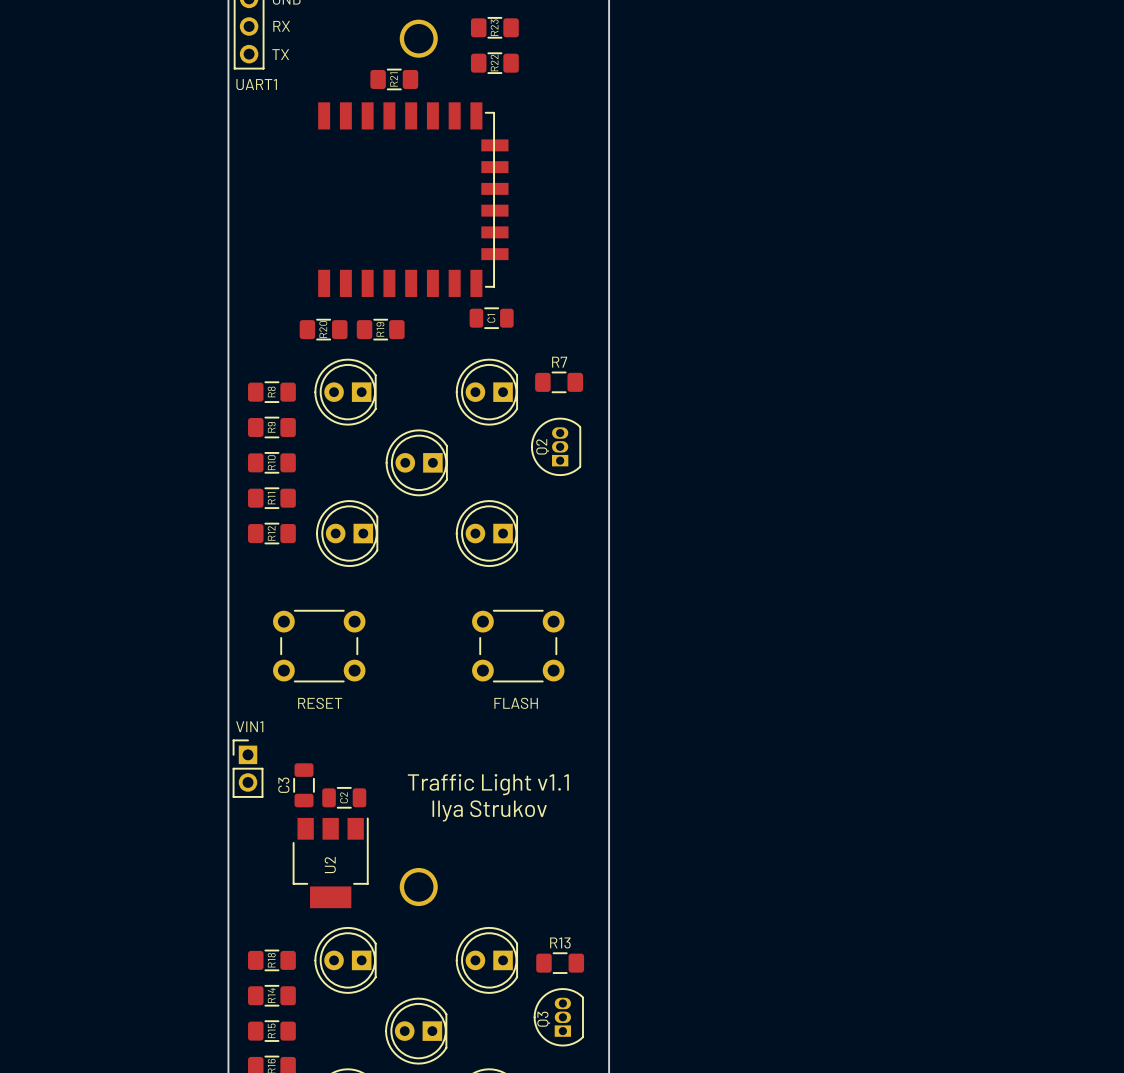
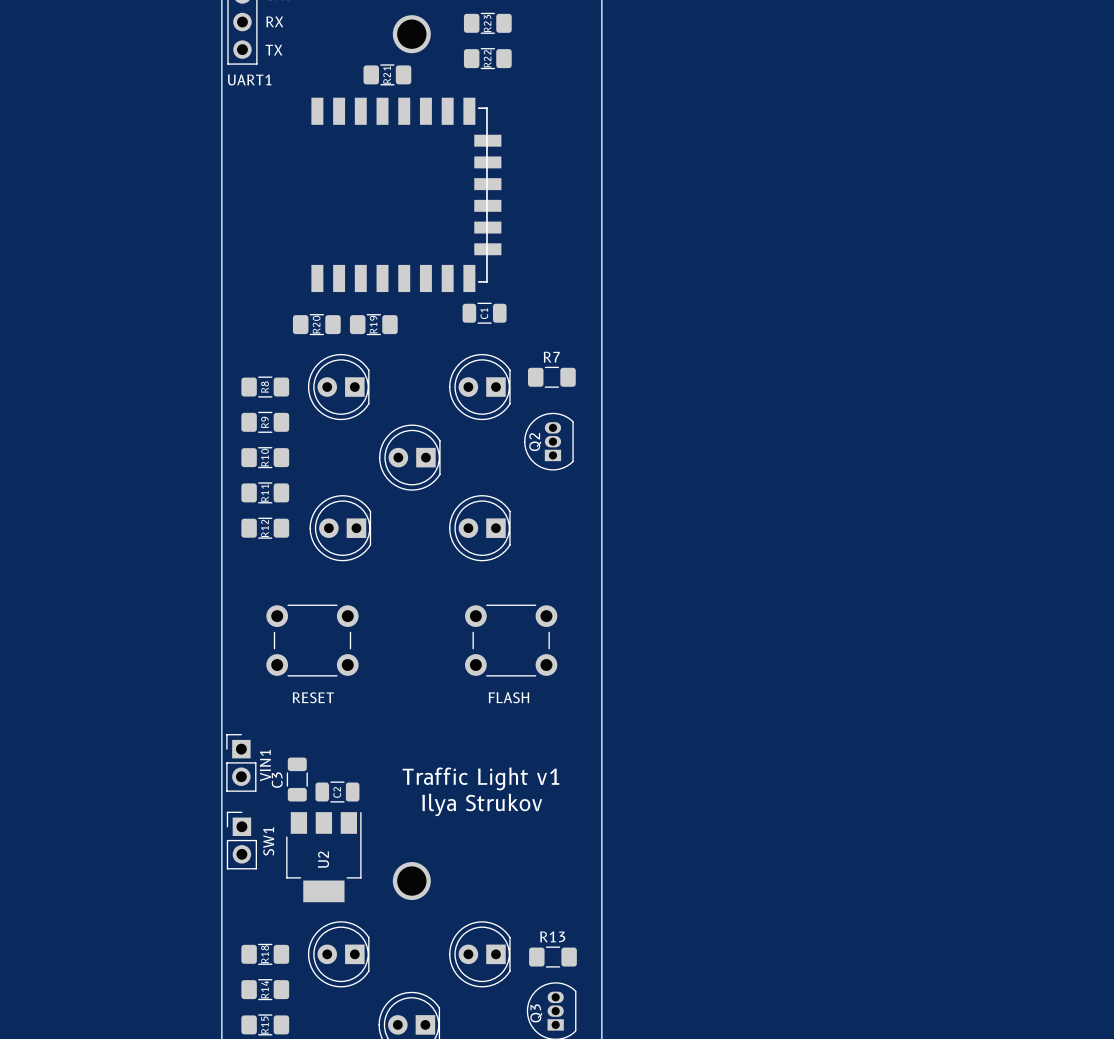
VIN1 name rotation: 0° (249, 726) -> 90° counterclockwise (265, 765)
VIN1 name position: VIN1 (249, 726) -> VIN1 (265, 765)
text: Traffic Light v1.1 (488, 784) -> Traffic Light v1 (480, 778)
SW1: none -> (241, 840)

